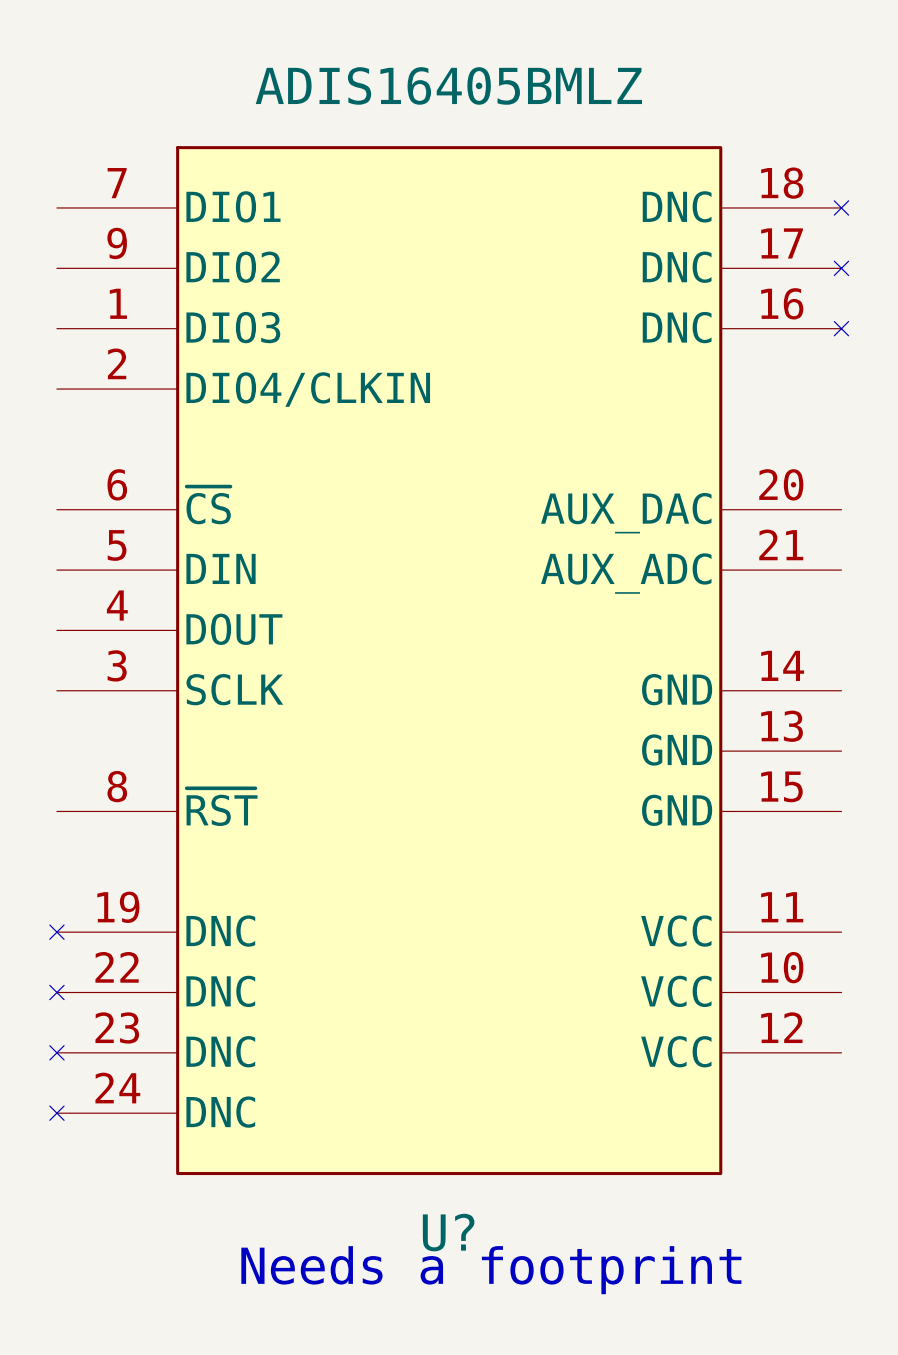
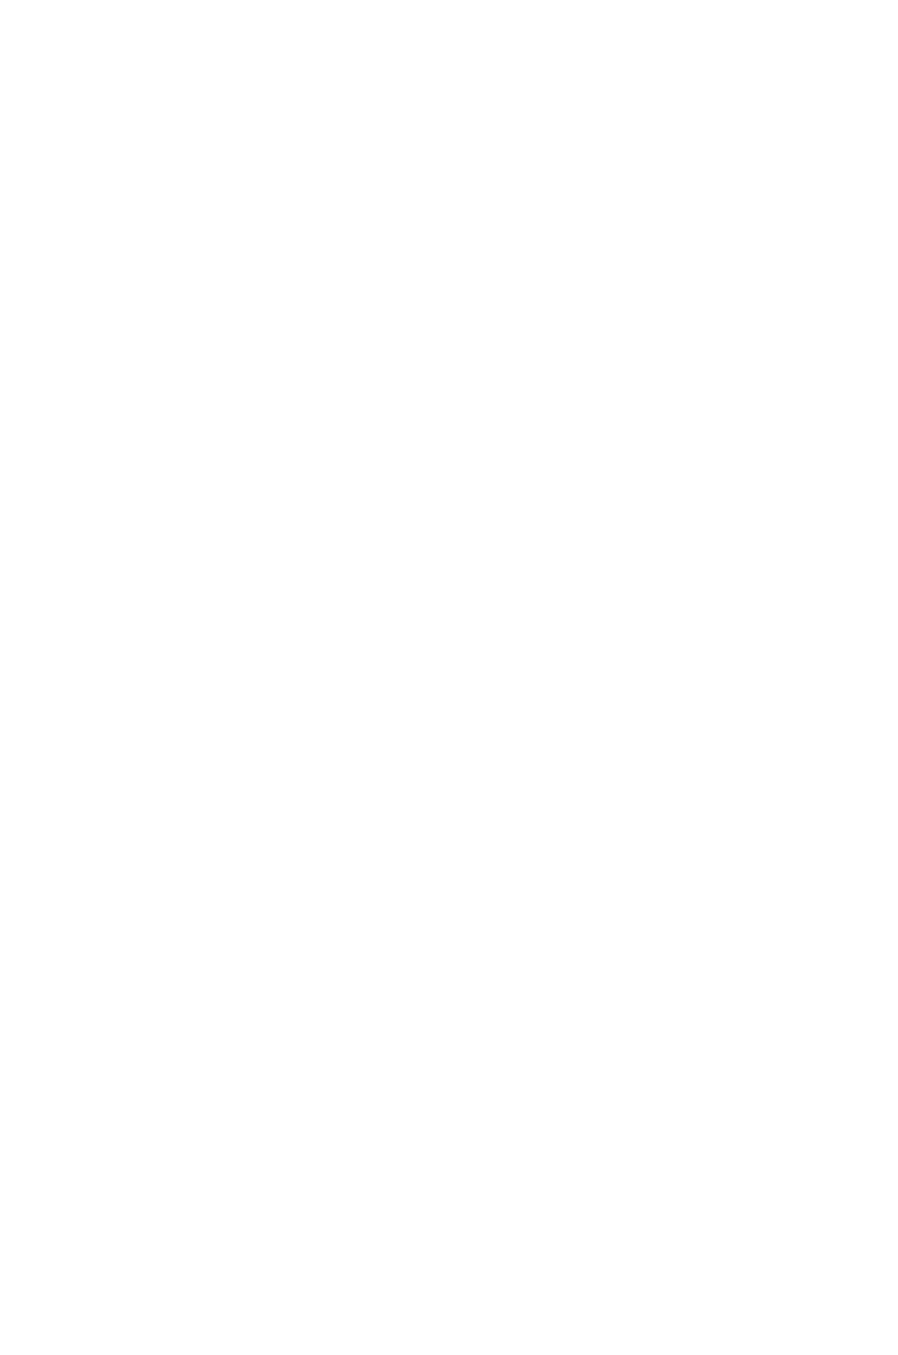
U?: ADIS16405BMLZ (449, 660) -> none
text: Needs a footprint (491, 1270) -> none

